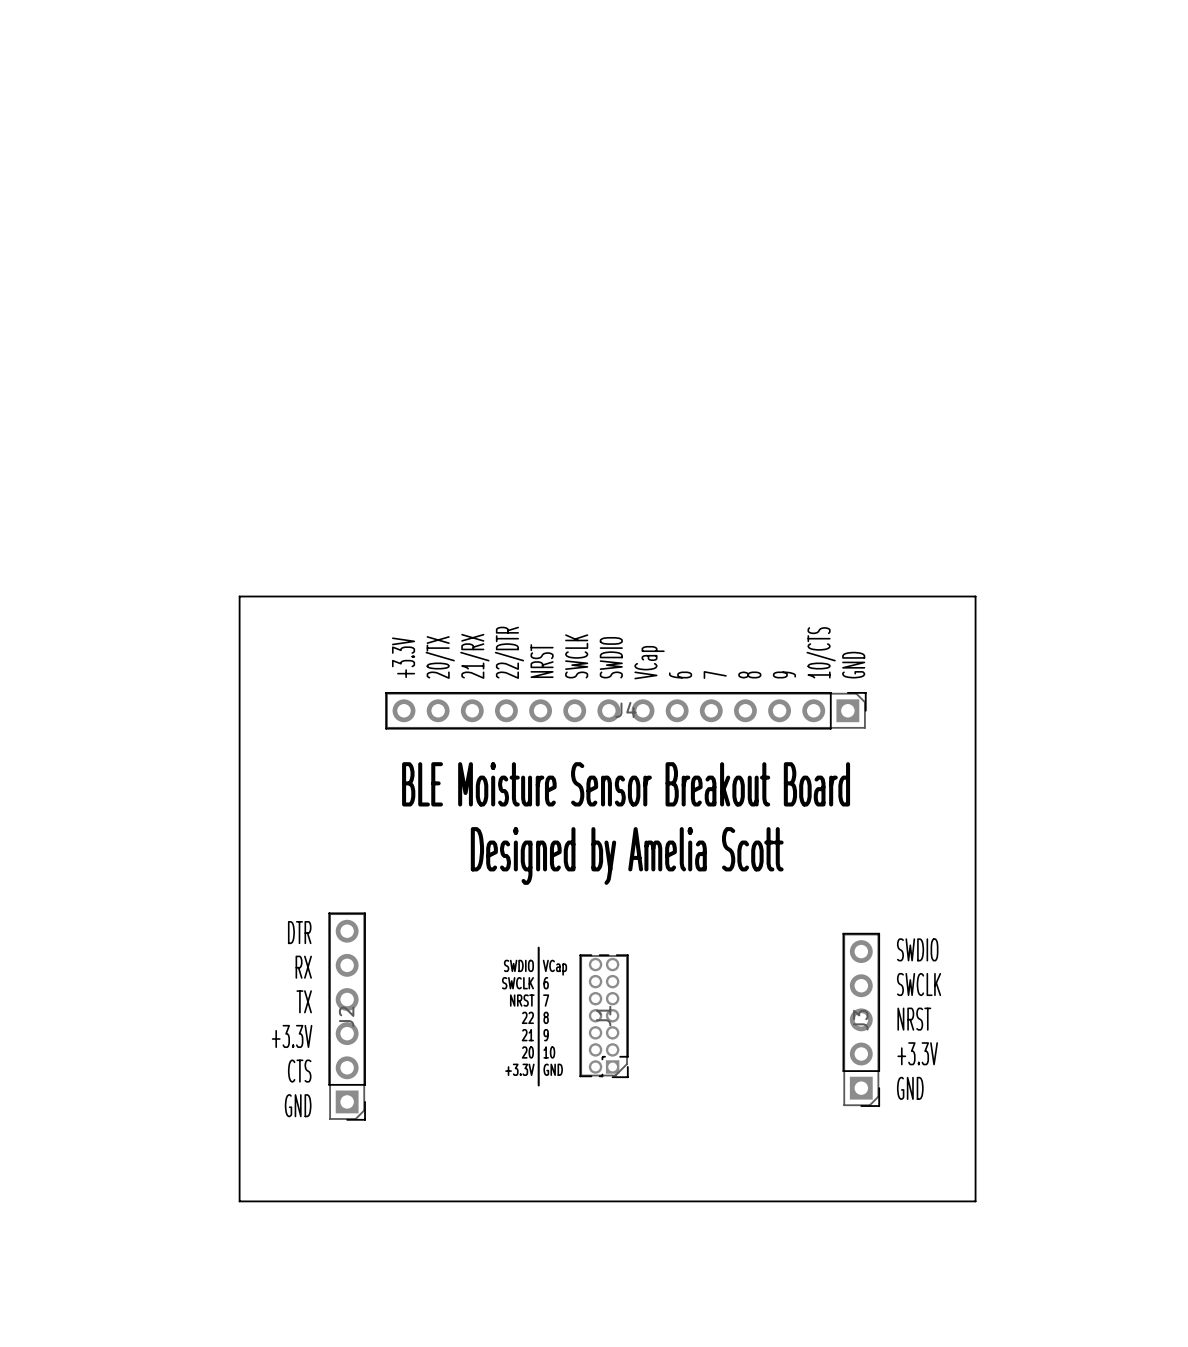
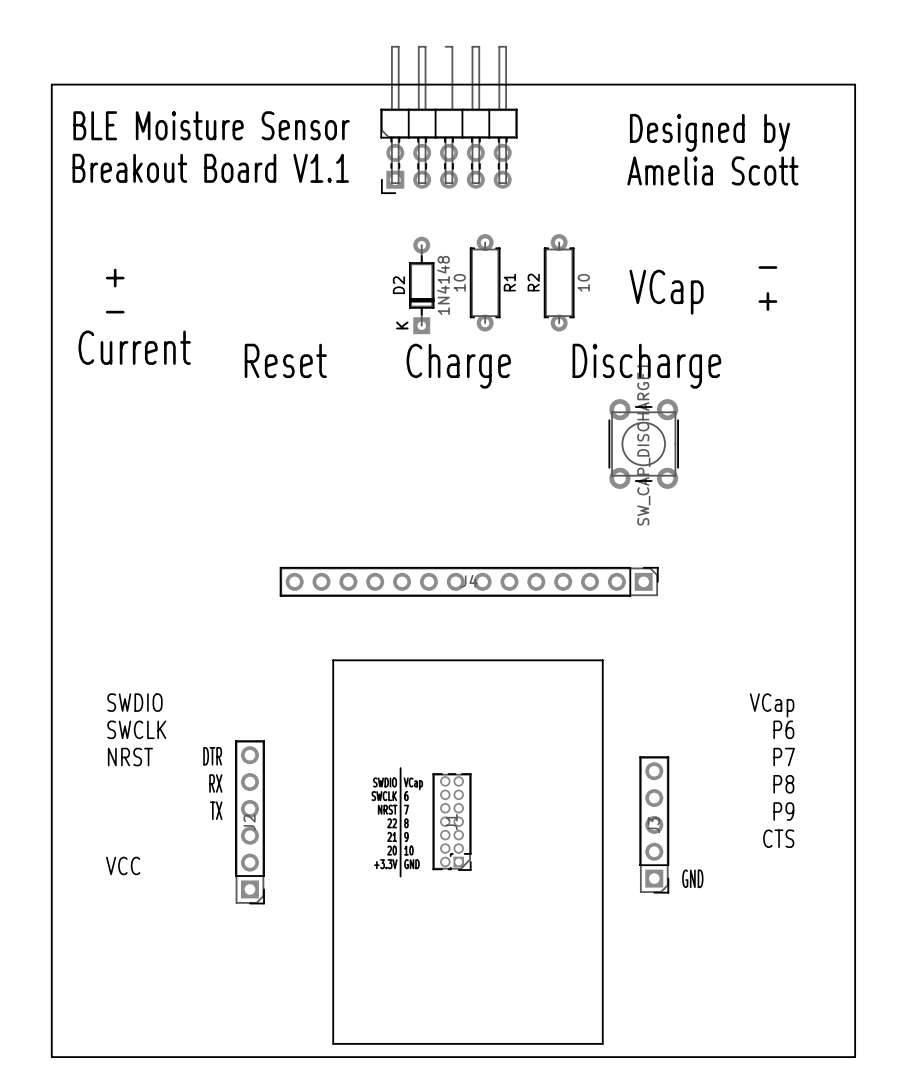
board edge: none -> (51, 84) (855, 84) (855, 1057) (51, 1057) (51, 84)
part: none -> (449, 120)
text: none -> BLE Moisture Sensor (211, 125)
text: none -> Designed by (709, 132)
text: none -> Breakout Board V1.1 (210, 168)
text: none -> Amelia Scott (712, 170)
text: none -> - (767, 267)
text: none -> + (115, 278)
R1: none -> 10 (485, 282)
R2: none -> 10 (559, 282)
D2: none -> 1N4148 (421, 285)
text: none -> VCap (666, 292)
text: none -> + (767, 301)
text: none -> - (115, 312)
text: none -> Current (134, 347)
text: none -> Reset (285, 360)
text: none -> Charge (458, 366)
text: none -> Discharge (646, 366)
SW_CAP_DISCHARGE1: none -> (643, 444)
board edge: (239, 596) (239, 1201) (975, 1201) (975, 596) (239, 596) -> none
text: 22/DTR (509, 652) -> none
text: 10/CTS (821, 652) -> none
text: 21/RX (474, 656) -> none
text: SWCLK (576, 656) -> none
text: +3.3V (403, 657) -> none
text: 20/TX (440, 657) -> none
text: SWDIO (611, 657) -> none
text: NRST (542, 661) -> none
text: VCap (649, 662) -> none
text: GND (853, 665) -> none
text: 6 (680, 674) -> none
text: 7 (715, 674) -> none
text: 8 (749, 674) -> none
text: 9 (784, 674) -> none
text: BLE Moisture Sensor Breakout Board (626, 784) -> none
line: none -> (333, 660) (602, 660) (602, 1043) (333, 1043) (333, 660)
text: Designed by Amelia Scott (627, 855) -> none
text: none -> SWDIO (134, 702)
text: none -> VCap (772, 705)
text: none -> SWCLK (136, 729)
text: none -> P6 (783, 729)
text: none -> NRST (130, 757)
text: none -> P7 (784, 757)
text: SWDIO (917, 949) -> none
text: none -> P8 (783, 784)
text: SWCLK (919, 984) -> none
text: none -> P9 (783, 811)
text: NRST (914, 1019) -> none
text: +3.3V (292, 1036) -> none
text: none -> CTS (778, 838)
text: +3.3V (917, 1053) -> none
text: CTS (299, 1071) -> none
text: none -> VCC (123, 865)
text: GND (298, 1105) -> none

